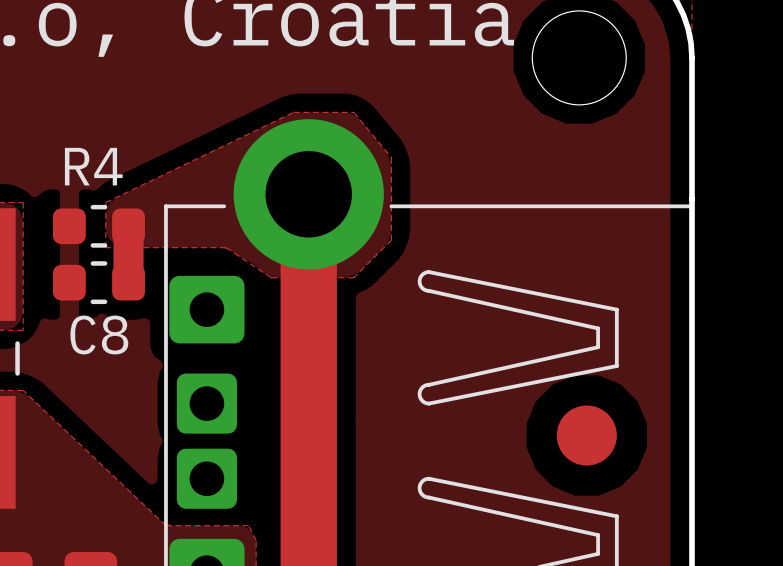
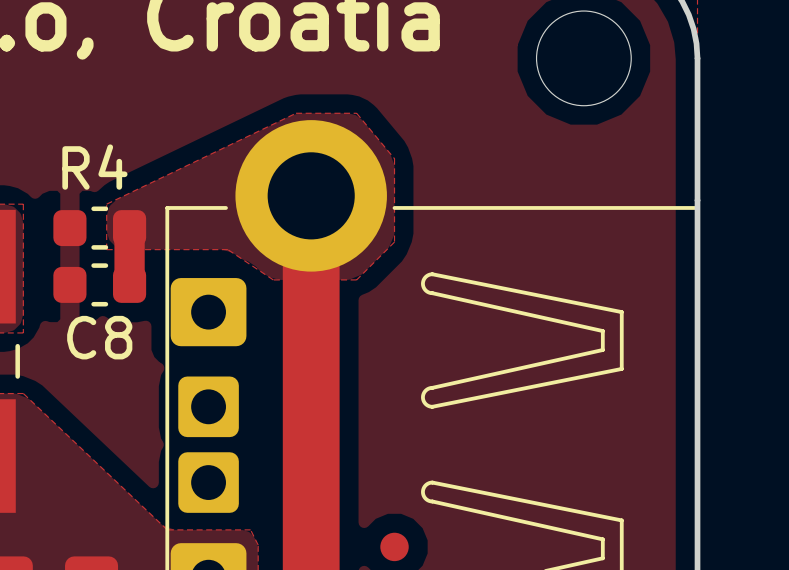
part: (586, 435) -> none
part: none -> (394, 546)

